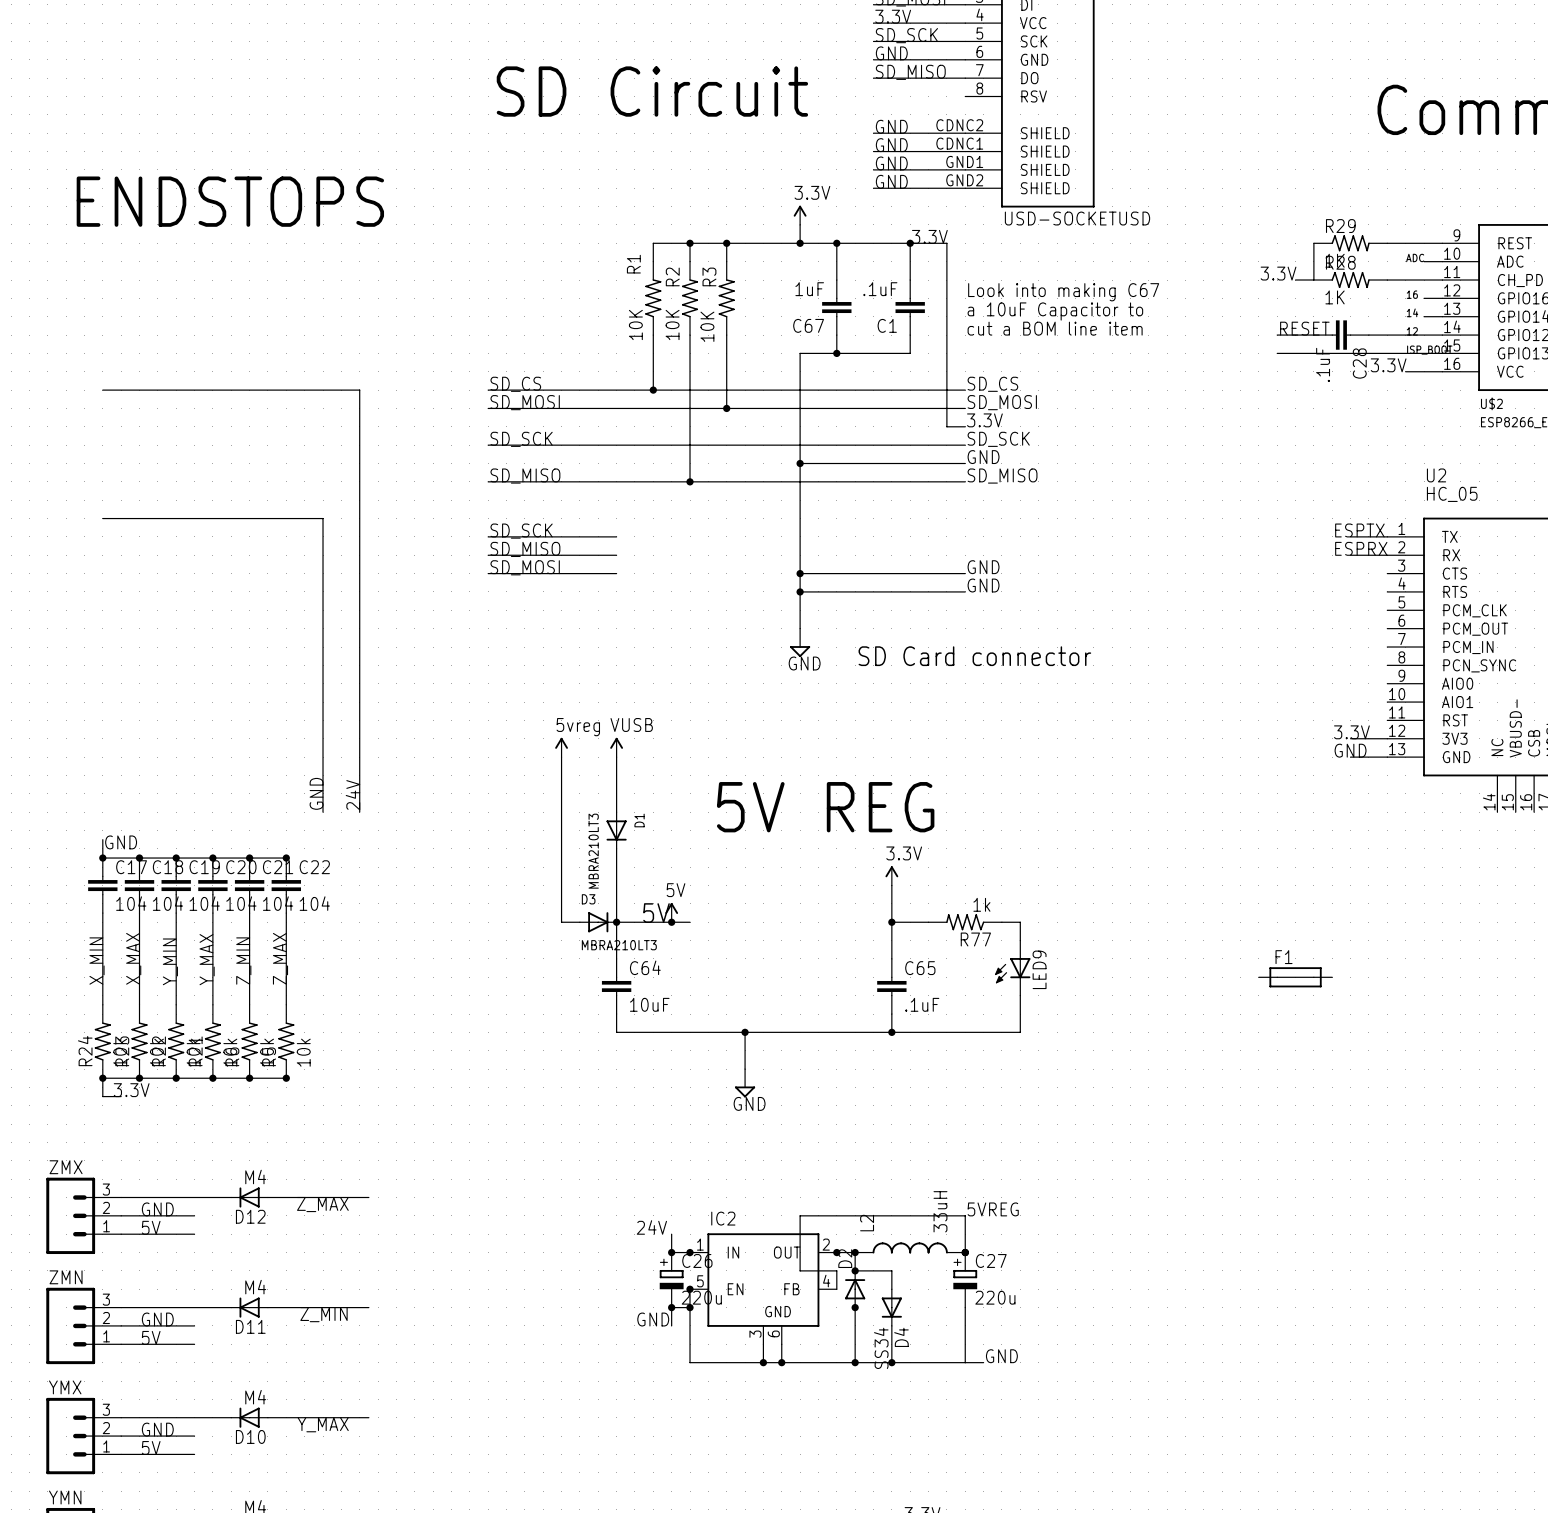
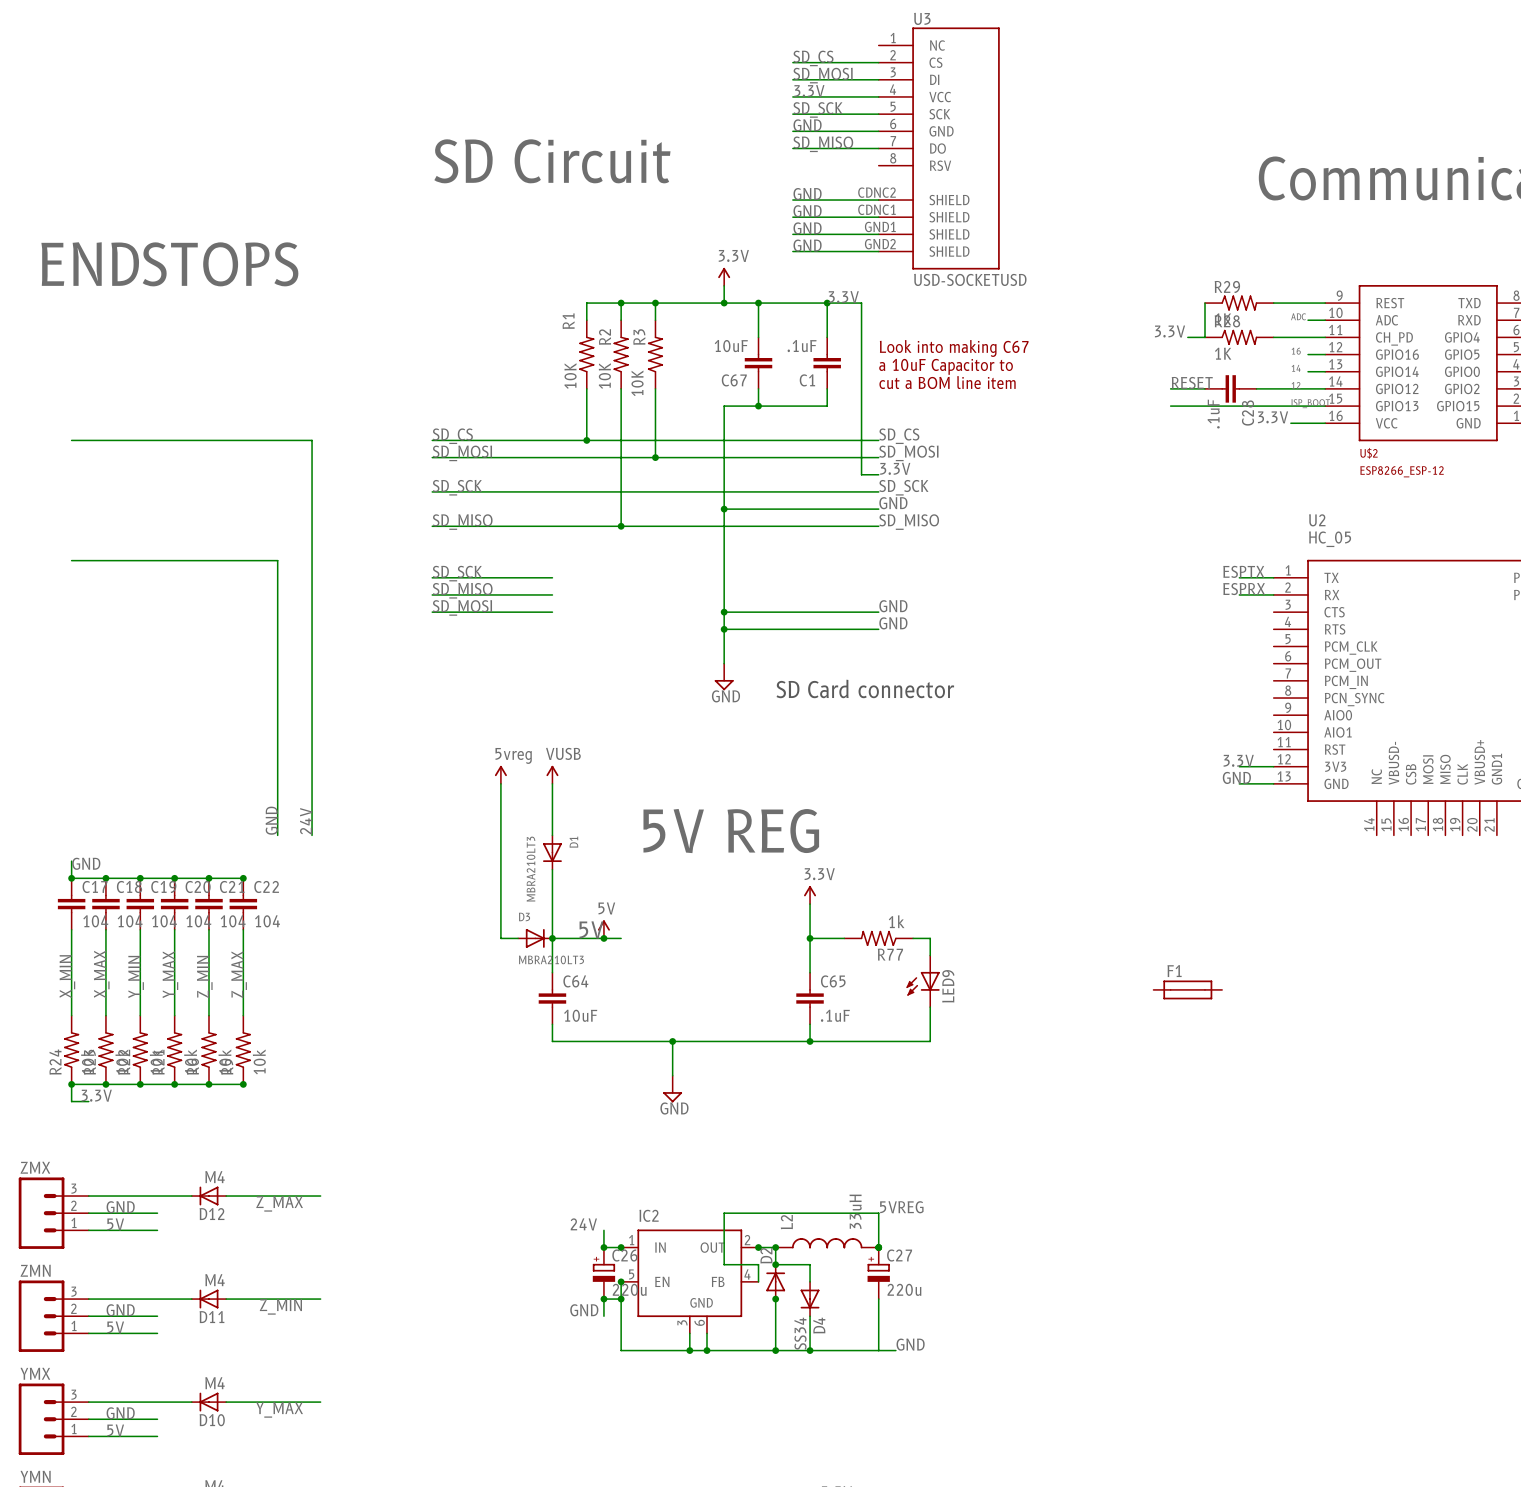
C67 value: 1uF (809, 289) -> 10uF (731, 346)

